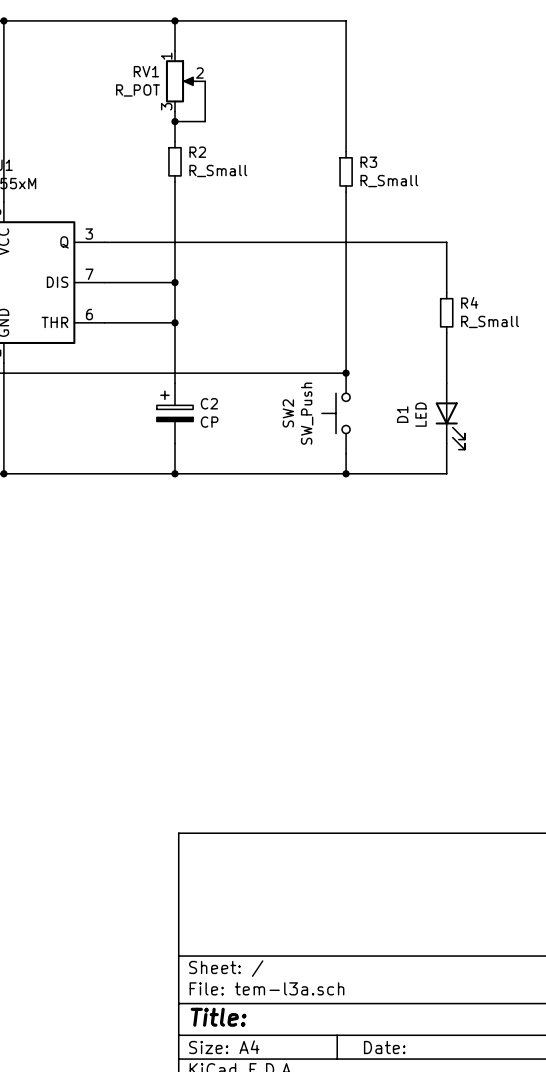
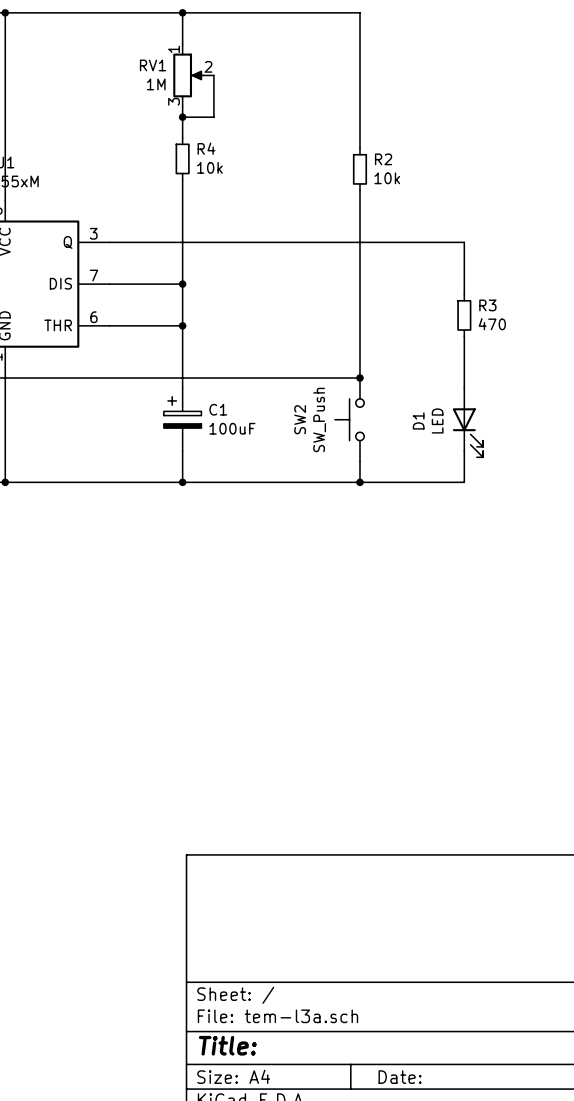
RV1 value: R_POT (138, 90) -> 1M (156, 84)
R2 name: R2 (197, 152) -> R4 (206, 148)
R3 name: R3 (368, 162) -> R2 (383, 159)
R2 value: R_Small (218, 170) -> 10k (209, 167)
R3 value: R_Small (389, 181) -> 10k (387, 178)
R4 name: R4 (469, 302) -> R3 (487, 305)
R4 value: R_Small (490, 321) -> 470 (492, 324)
C2 name: C2 (209, 403) -> C1 (218, 409)
C2 value: CP (209, 422) -> 100uF (232, 428)

